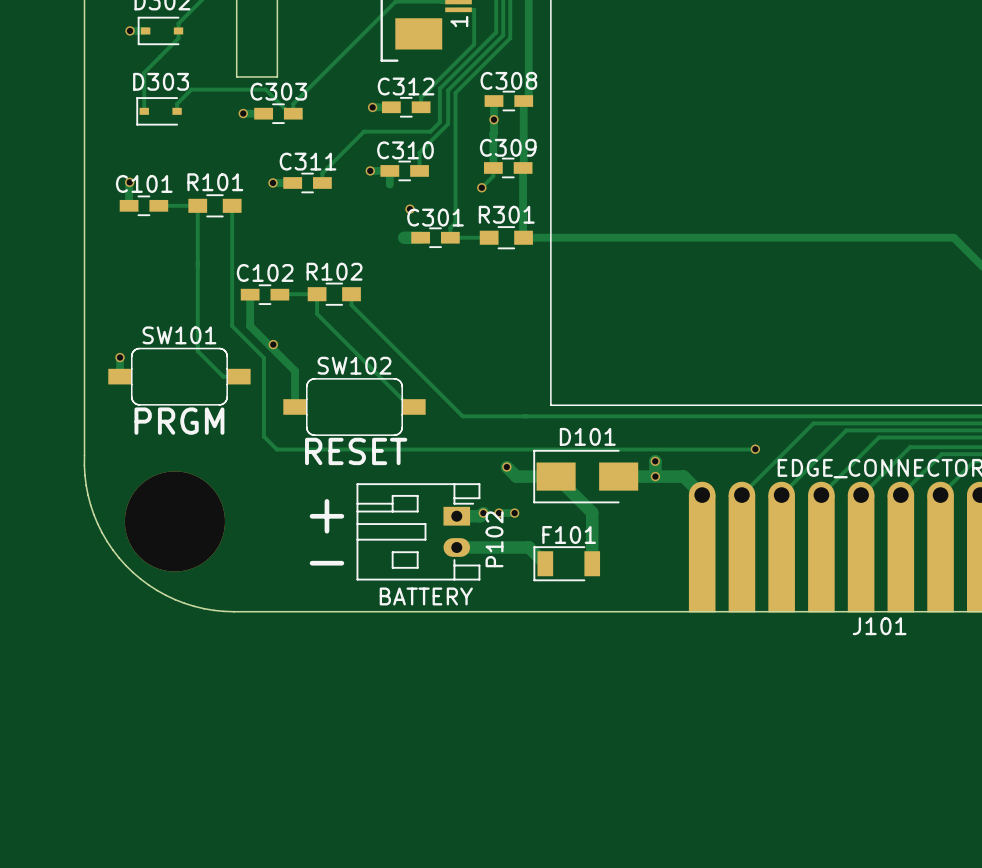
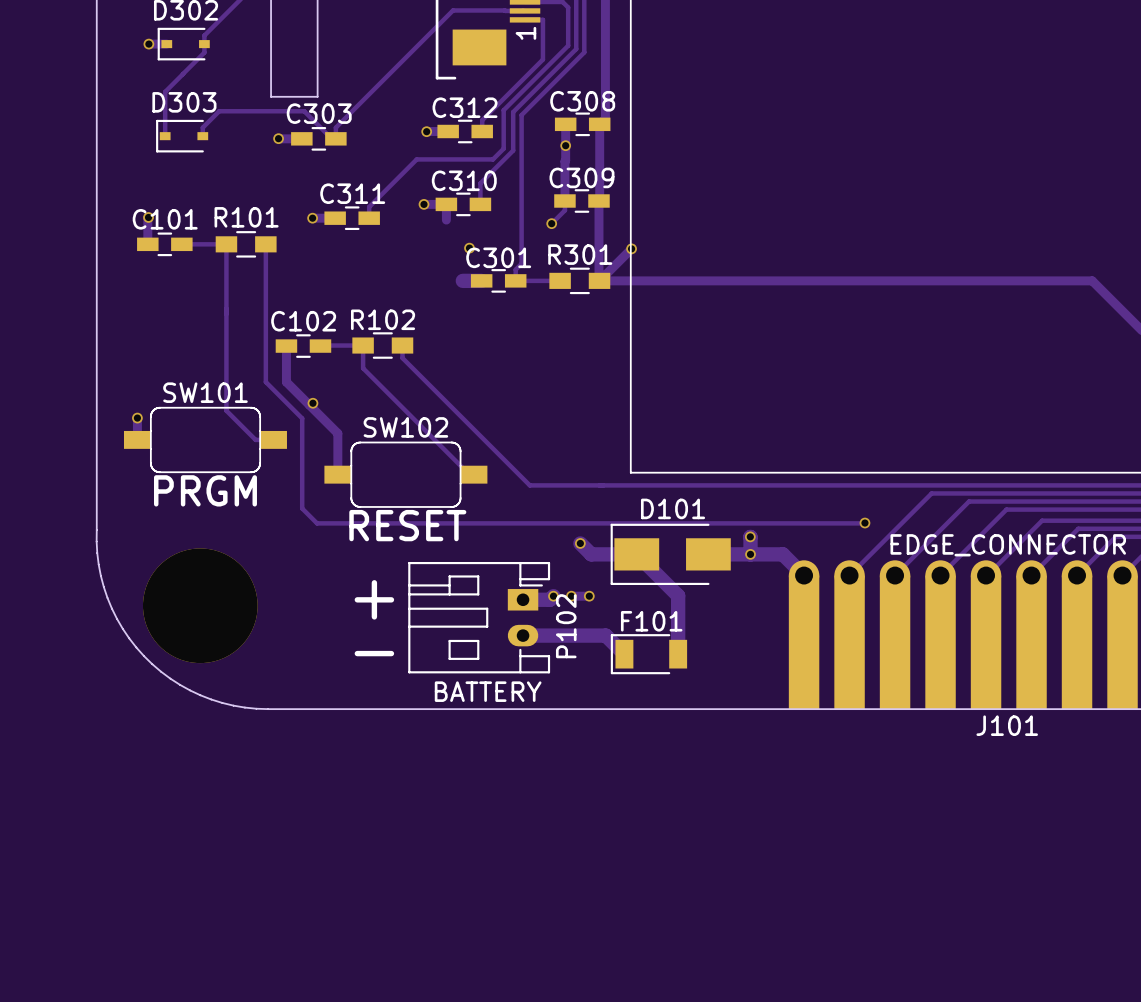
track: none -> (631, 248) (599, 280)
via: none -> (631, 248)

